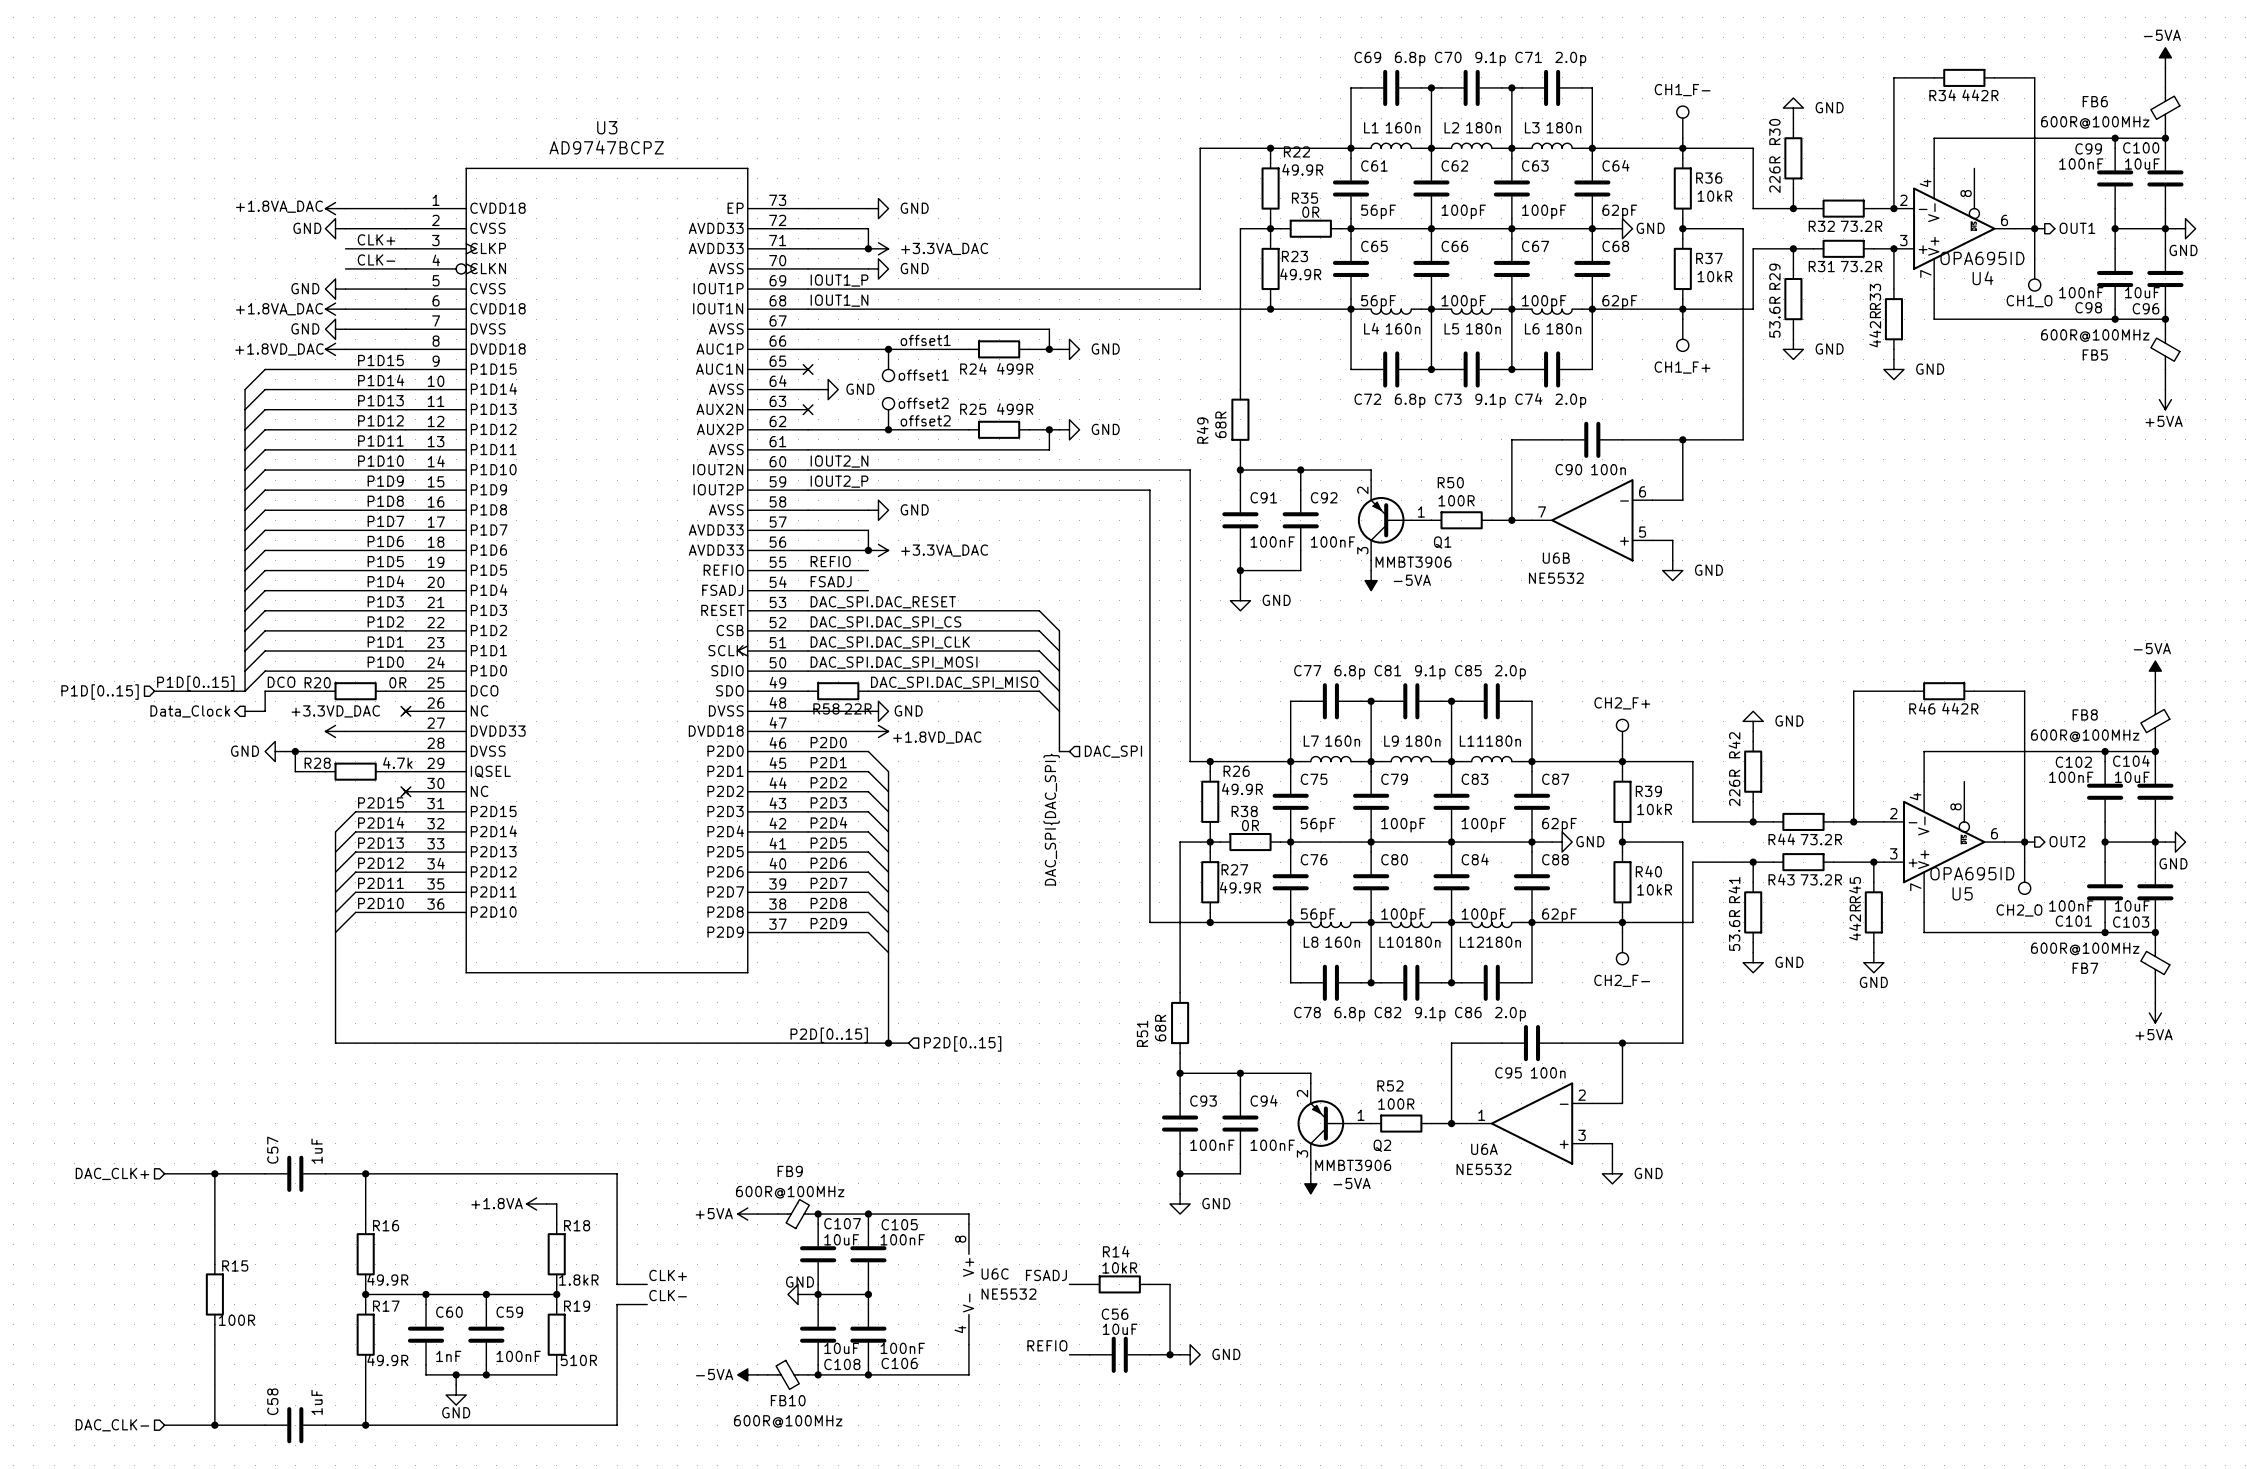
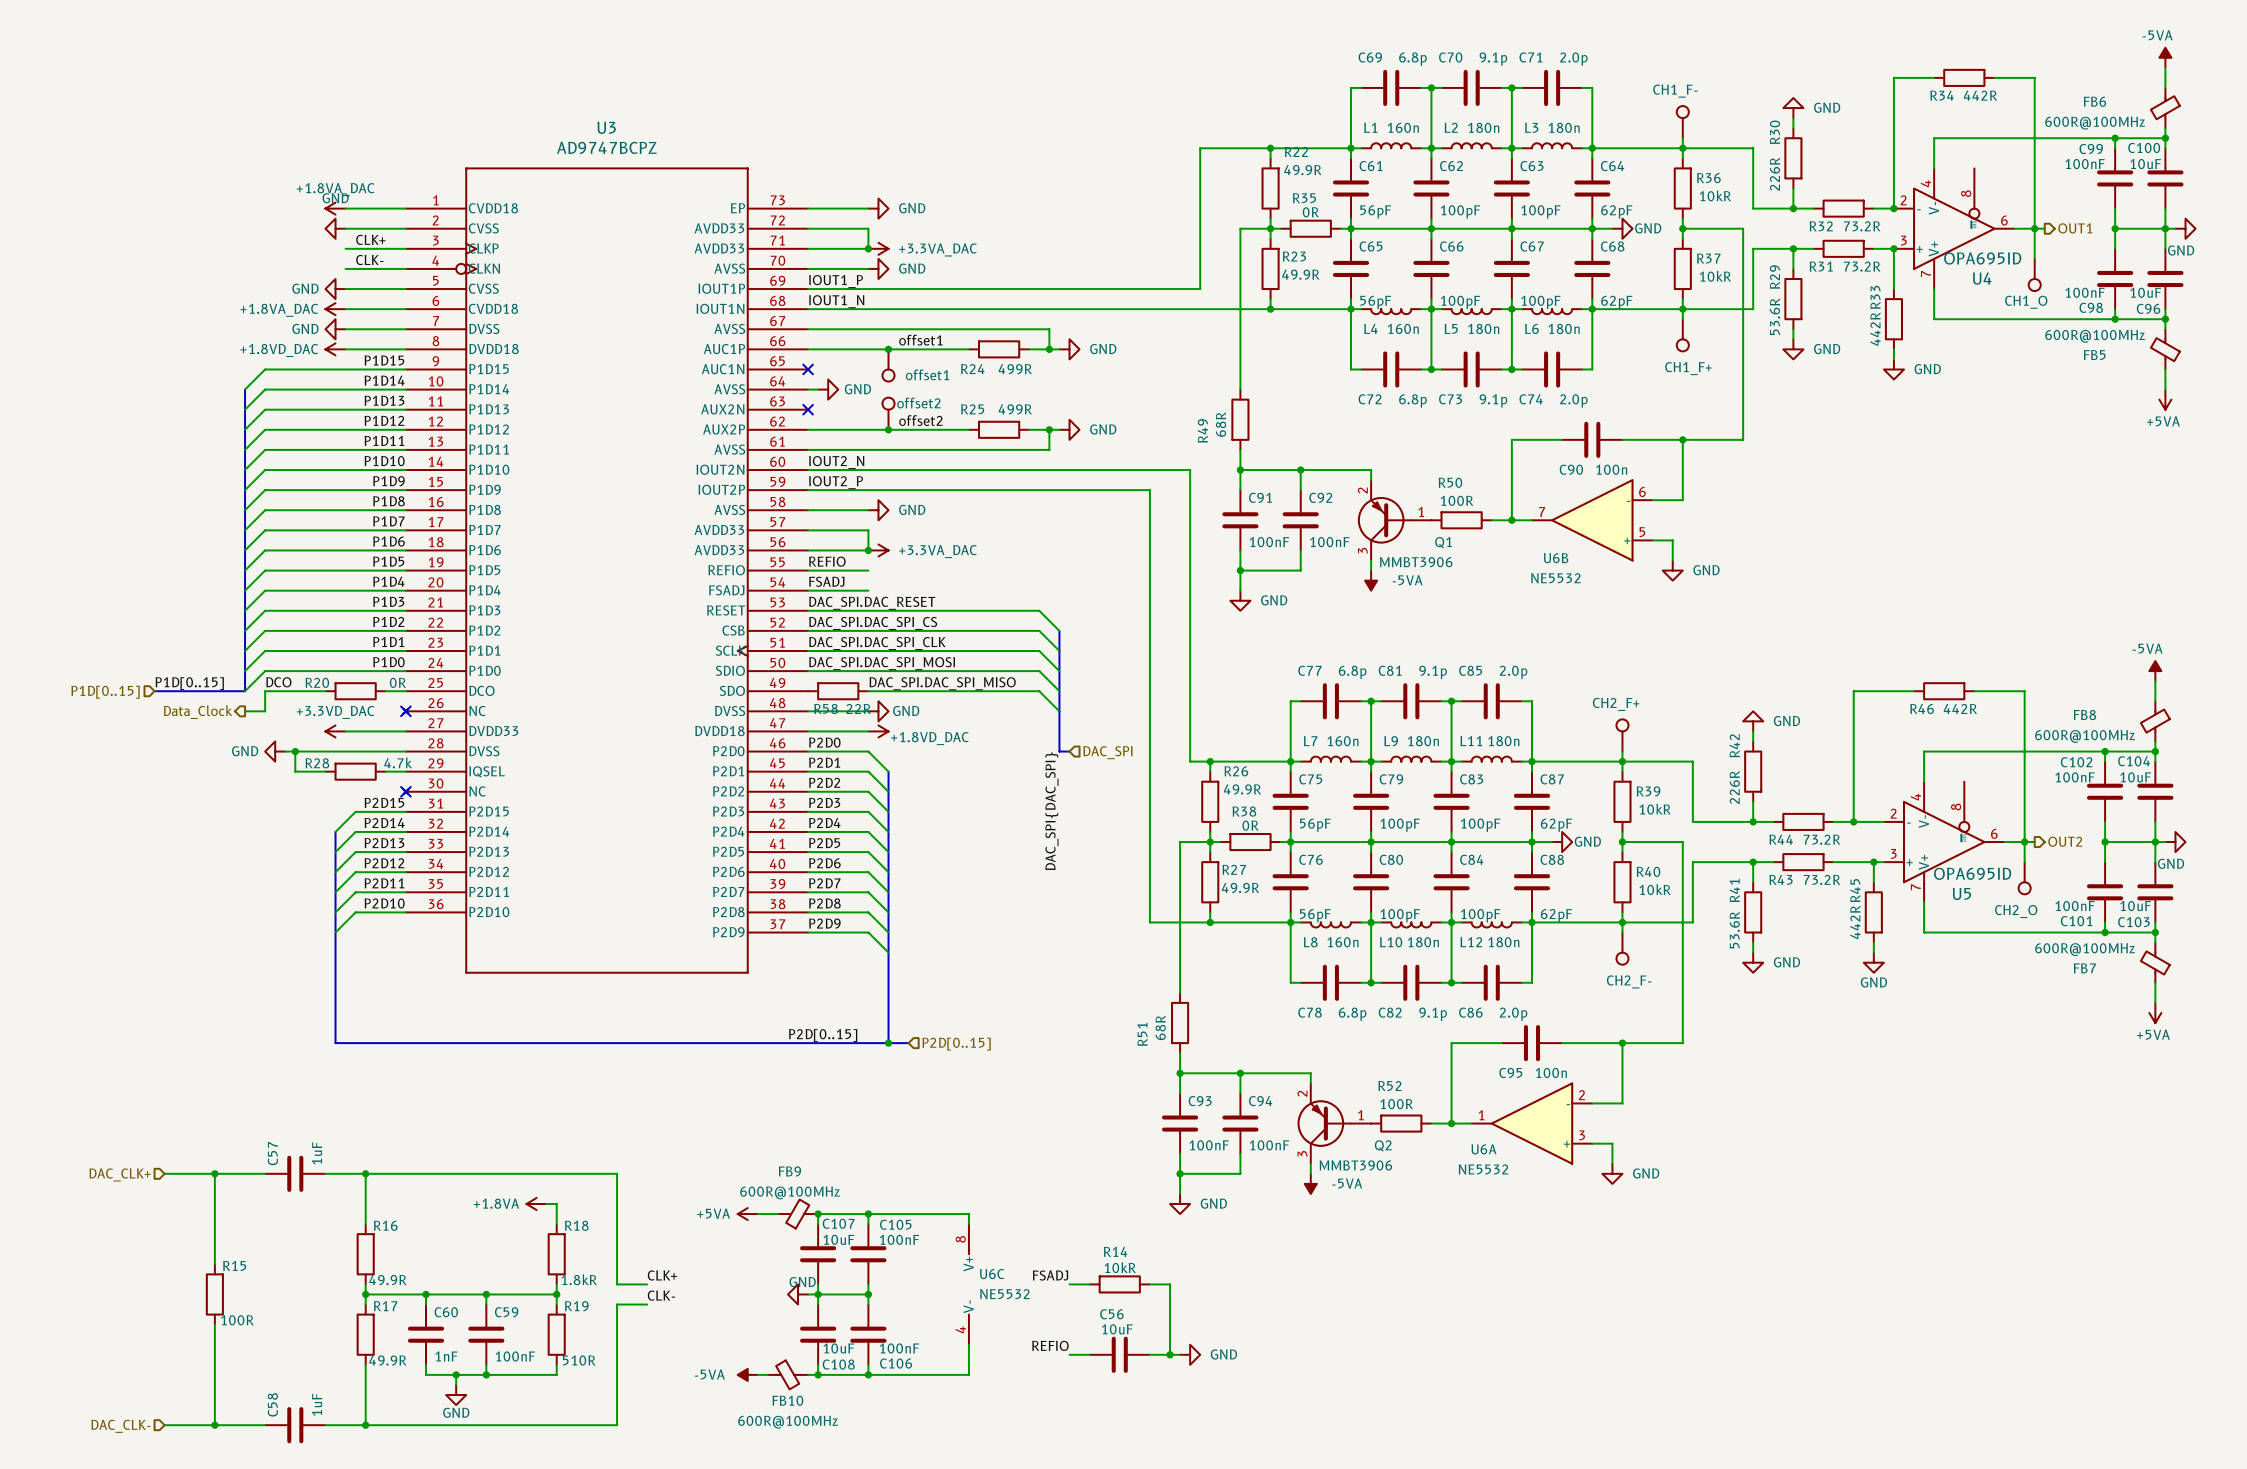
power symbol text position: +1.8VA_DAC (279, 206) -> +1.8VA_DAC (335, 189)
power symbol text position: GND (307, 228) -> GND (335, 198)

